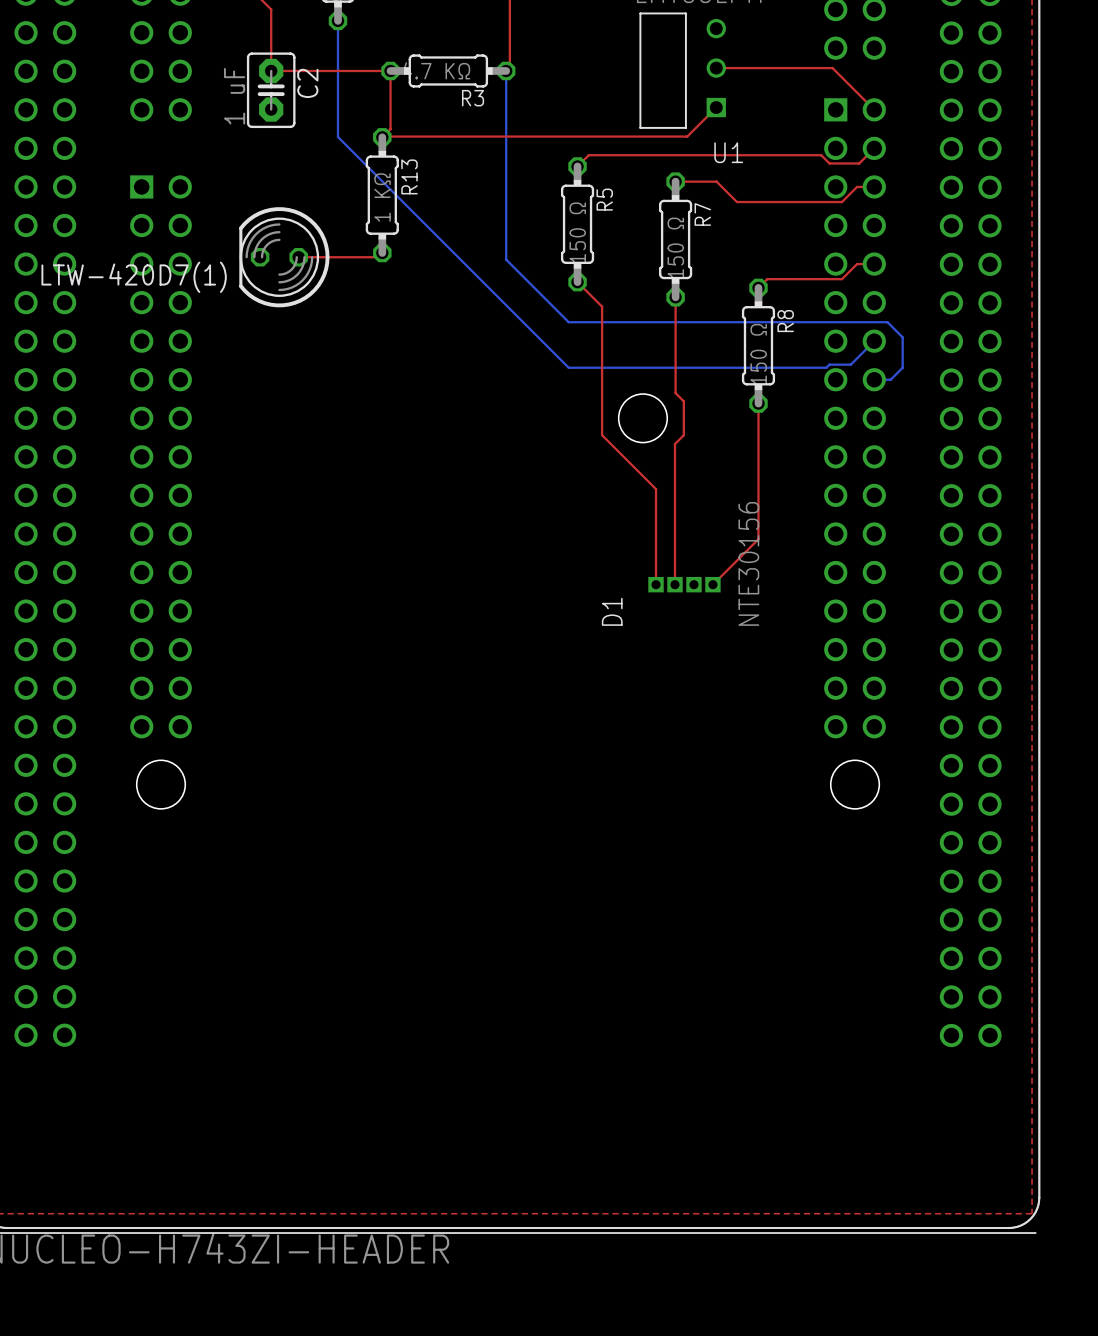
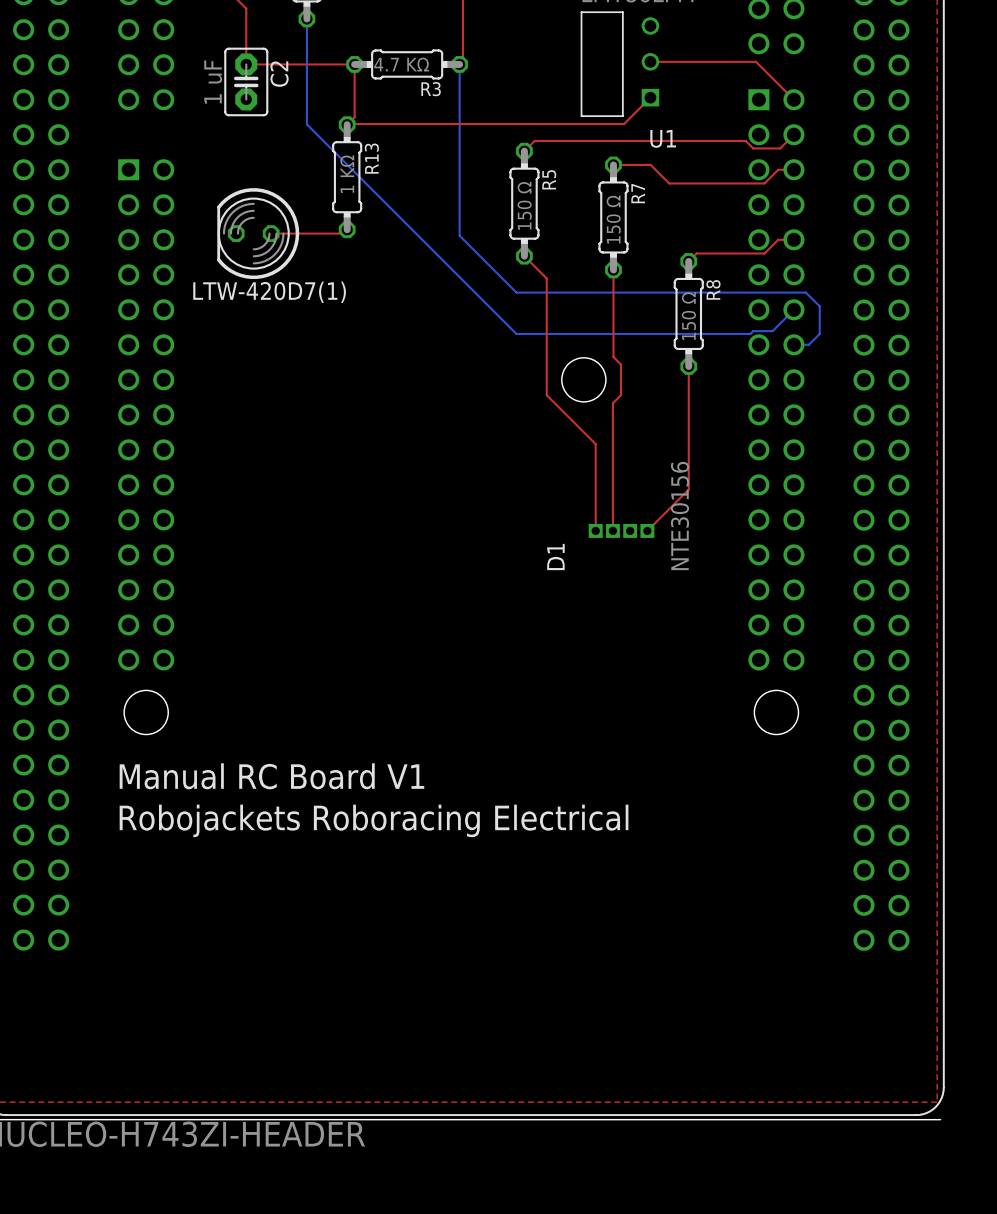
LTW-420D7(1) name position: LTW-420D7(1) (134, 277) -> LTW-420D7(1) (269, 292)
text: none -> Manual RC Board V1 (271, 776)
text: none -> Robojackets Roboracing Electrical (374, 820)

